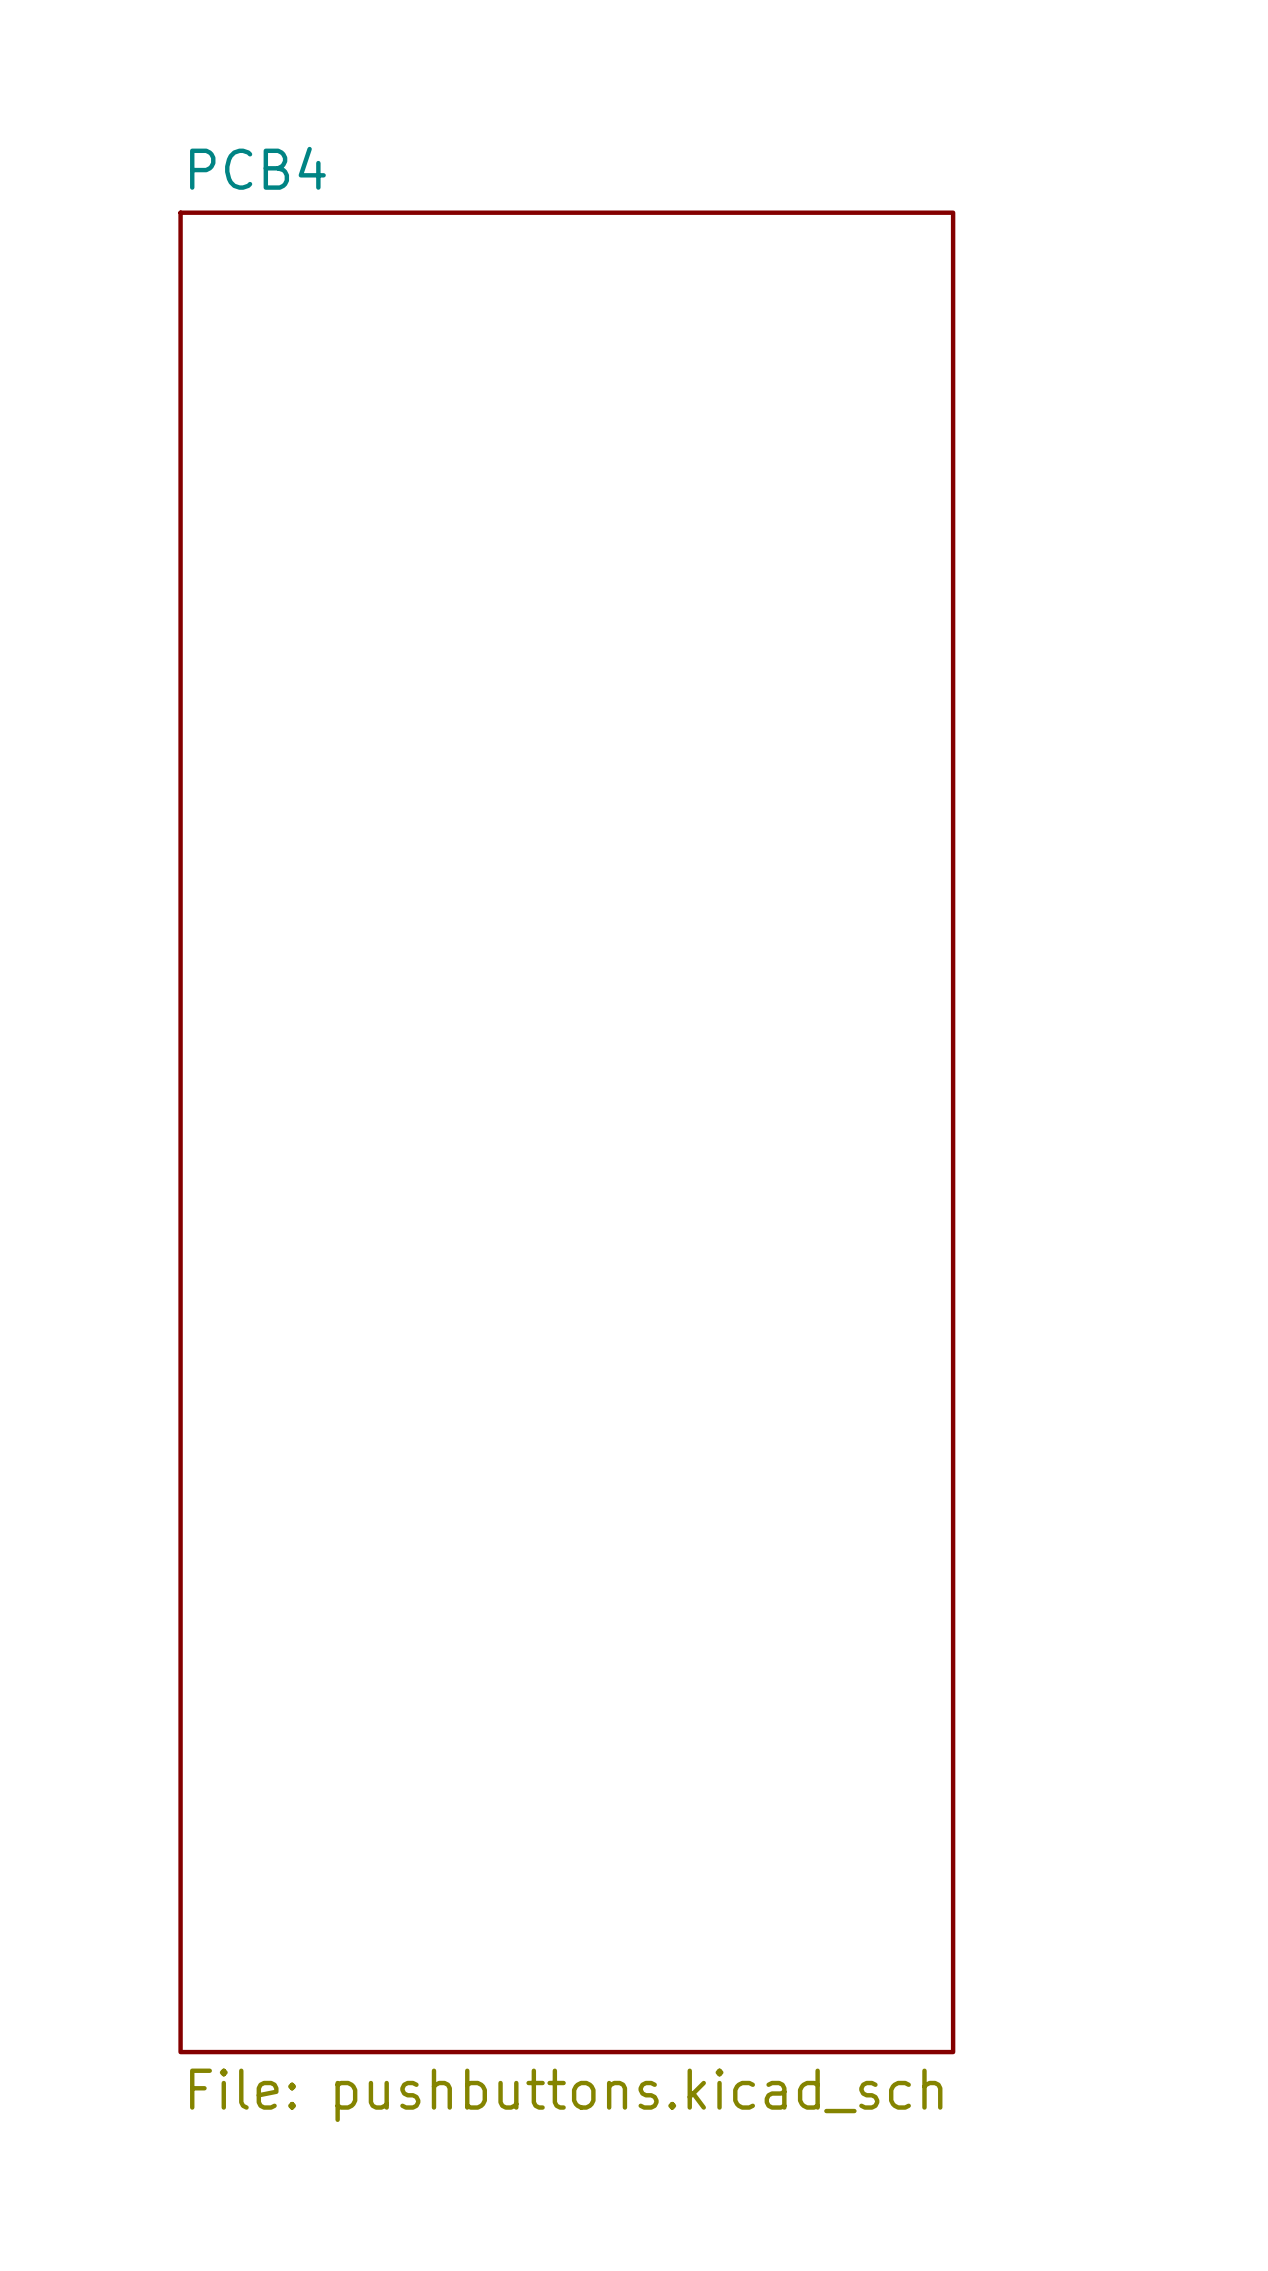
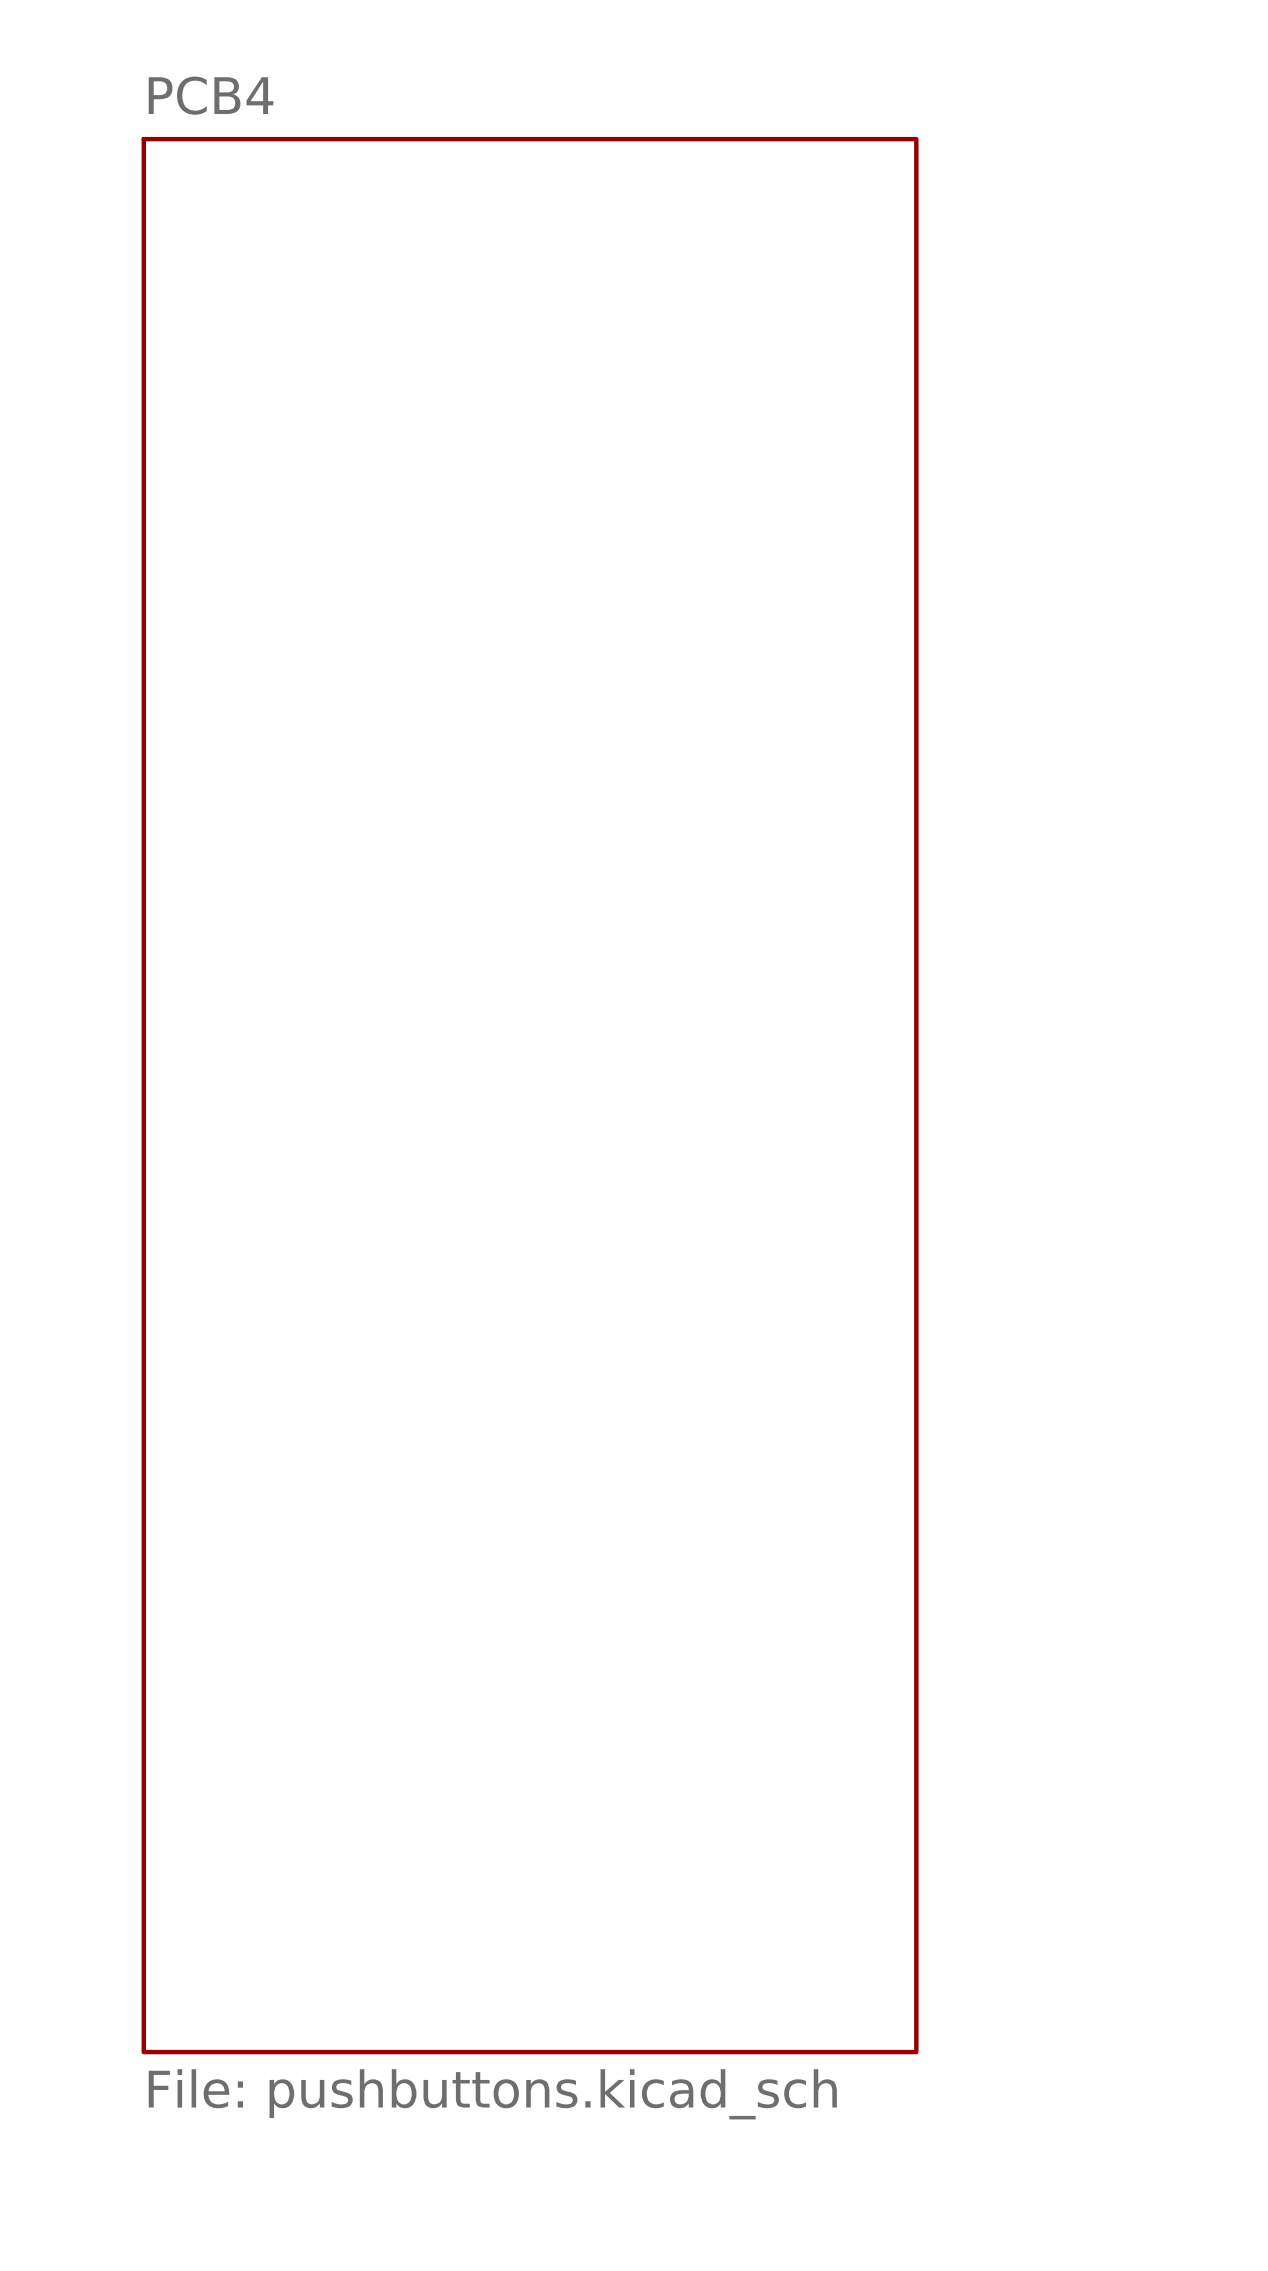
sheet PCB4 shape: [178, 210, 956, 2055] -> [141, 136, 919, 2055]

